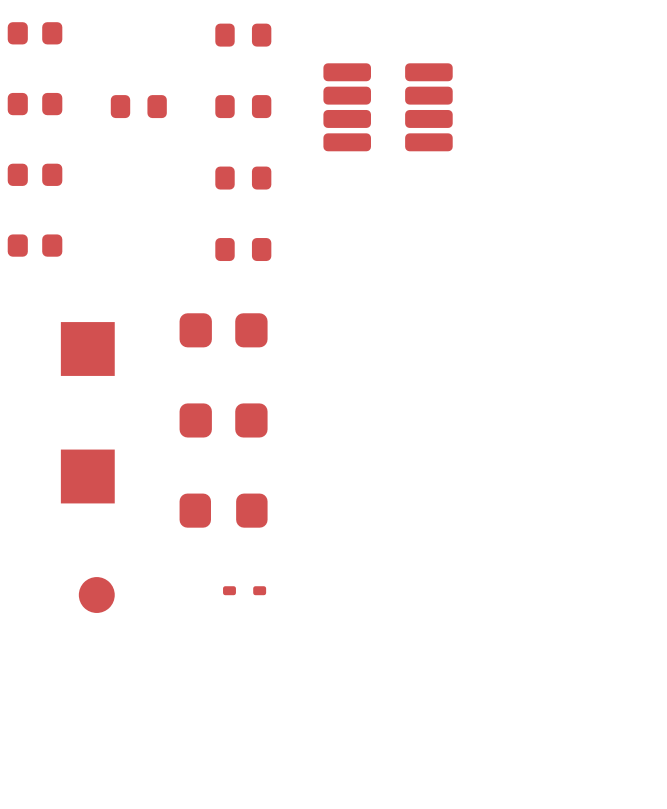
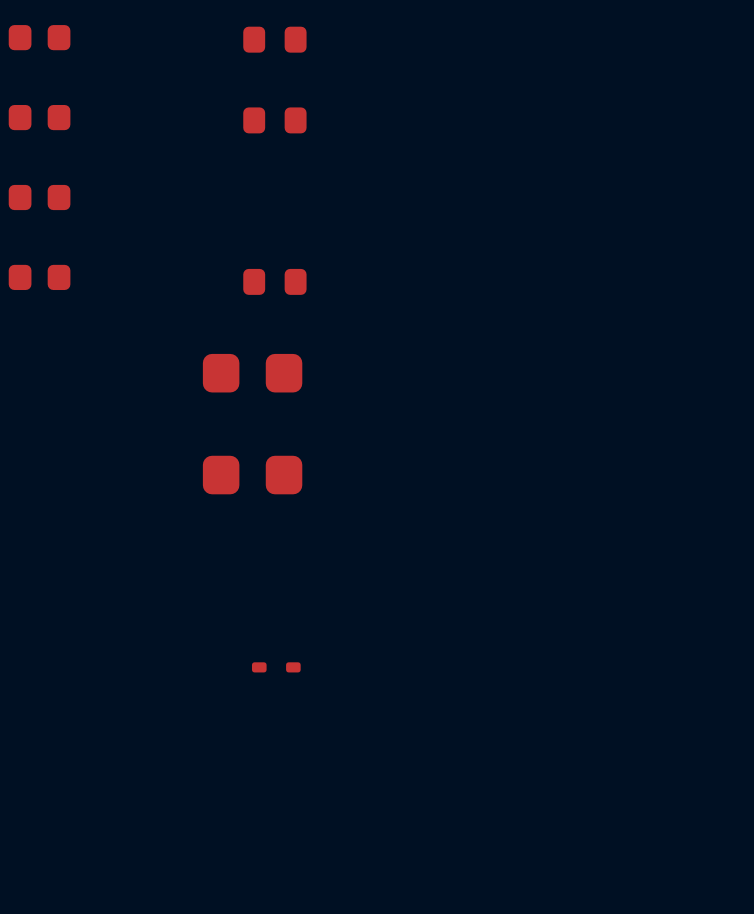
part: (138, 106) -> none
part: (388, 107) -> none
part: (243, 178) -> none
part: (87, 349) -> none
part: (87, 476) -> none
part: (223, 510) -> none
part: (96, 595) -> none

